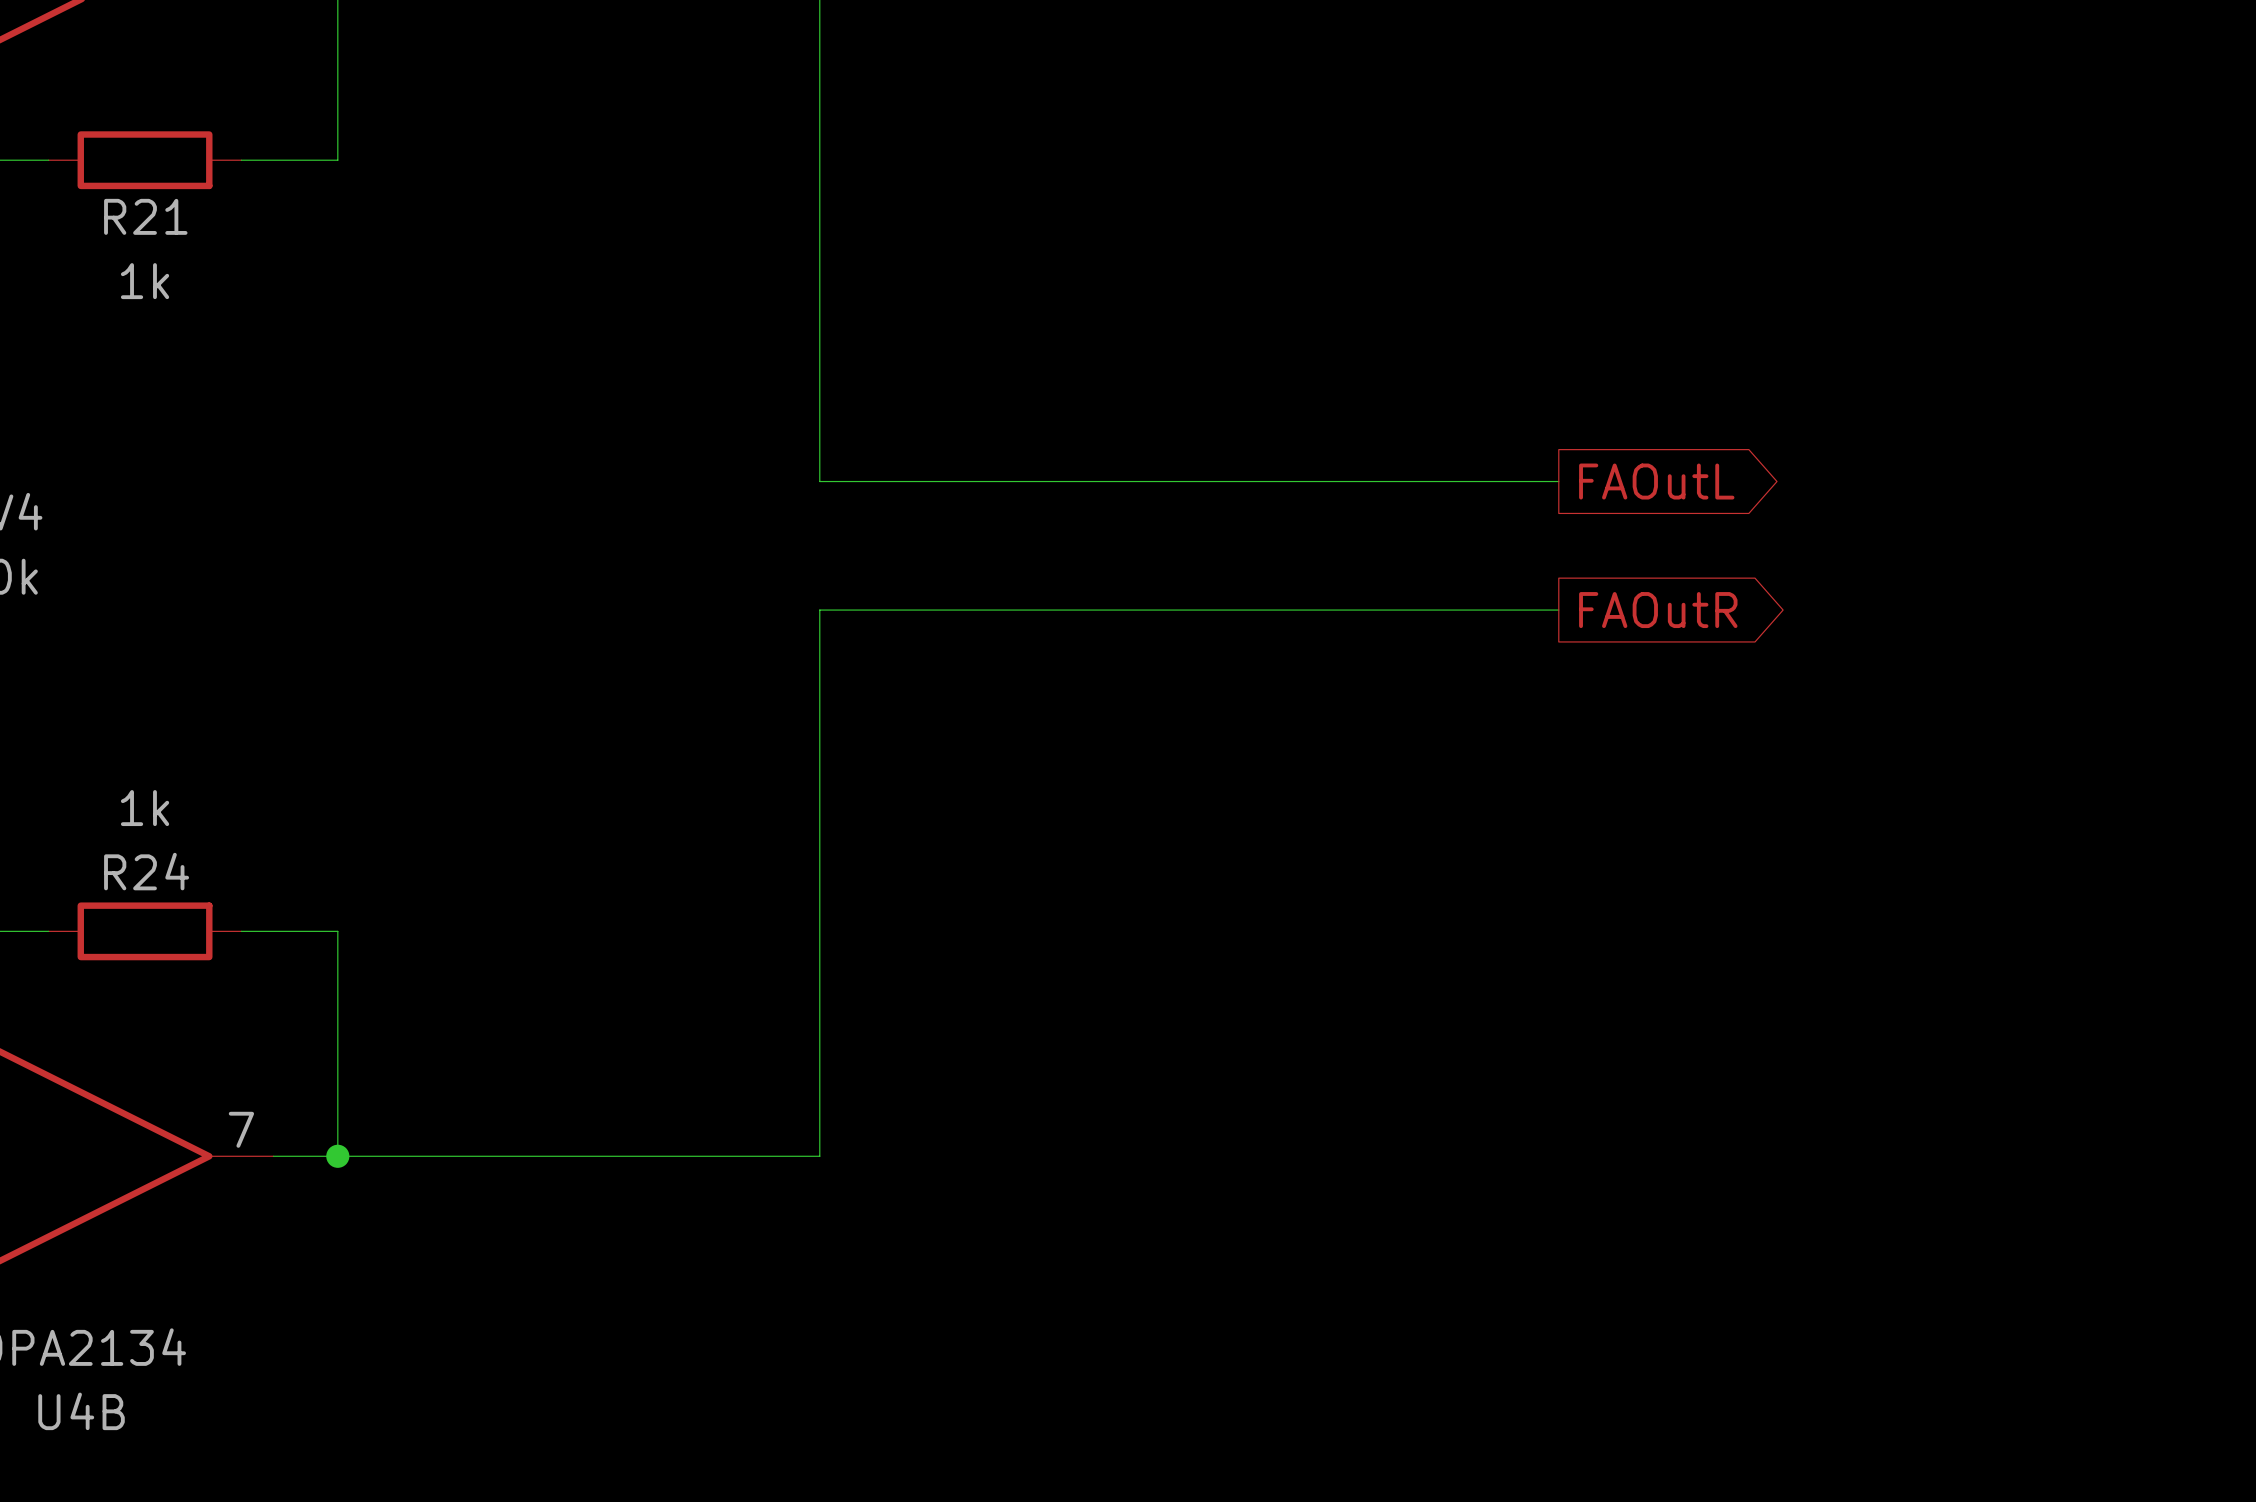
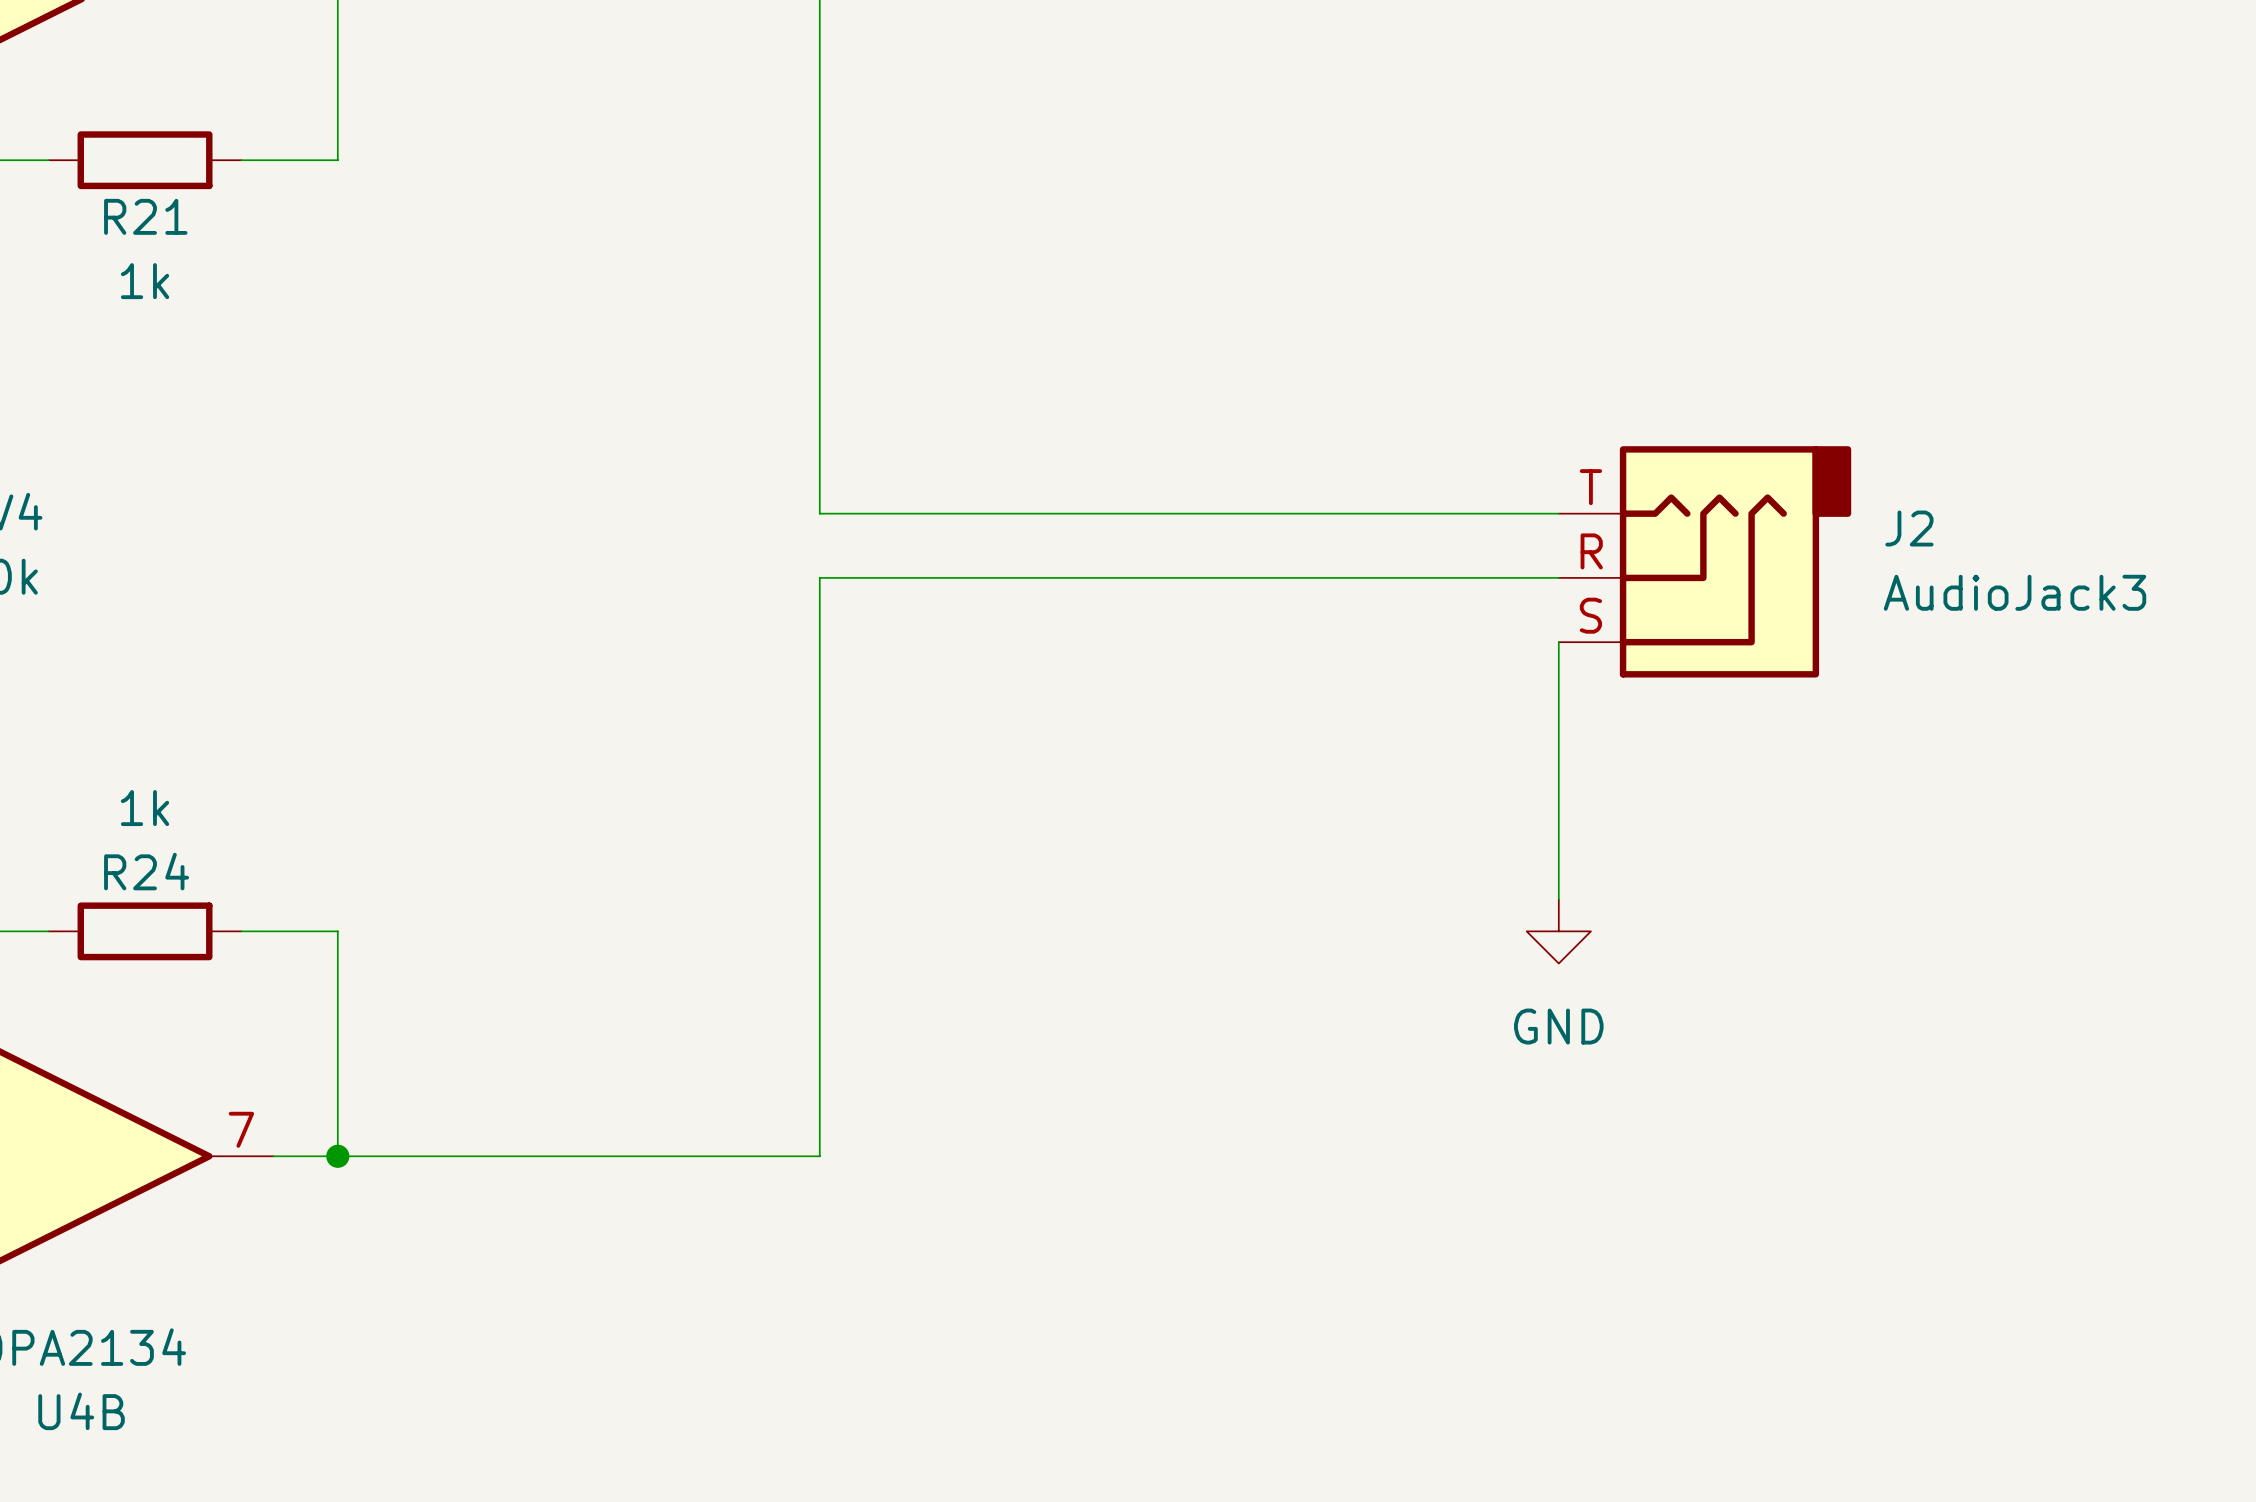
wire: (819, 481) (1558, 481) -> (819, 481) (819, 513) (1558, 513)
global label: FAOutL (1656, 481) -> none
J2: none -> AudioJack3 (1704, 561)
wire: (819, 610) (1558, 610) -> (819, 610) (819, 577) (1558, 577)
global label: FAOutR (1658, 610) -> none
wire: none -> (1558, 642) (1558, 899)
power symbol: none -> GND (1558, 931)

